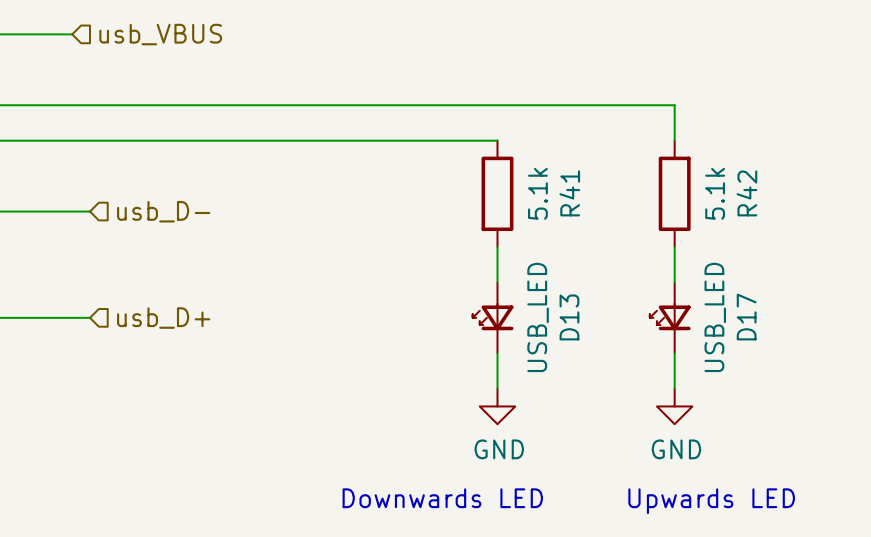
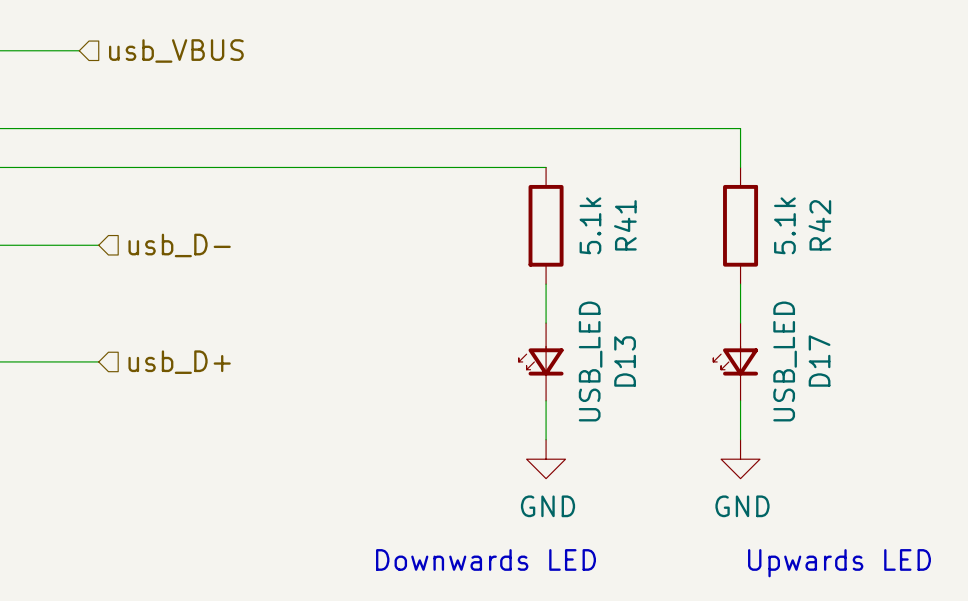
text position: Upwards LED (711, 501) -> Upwards LED (839, 563)

